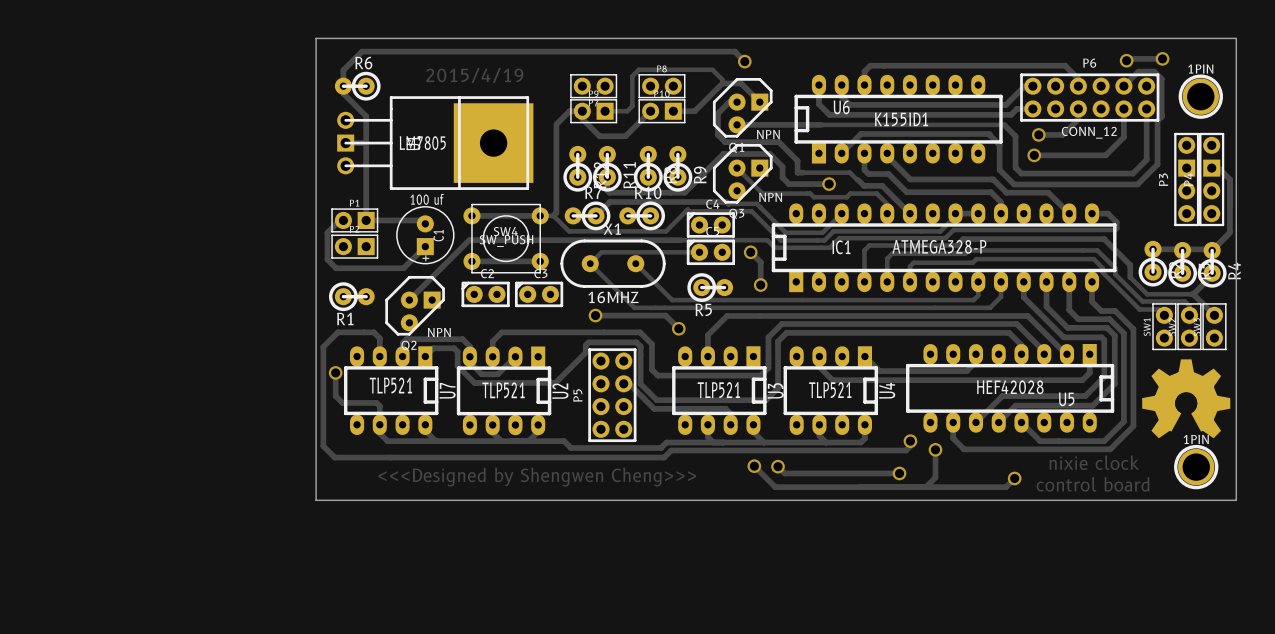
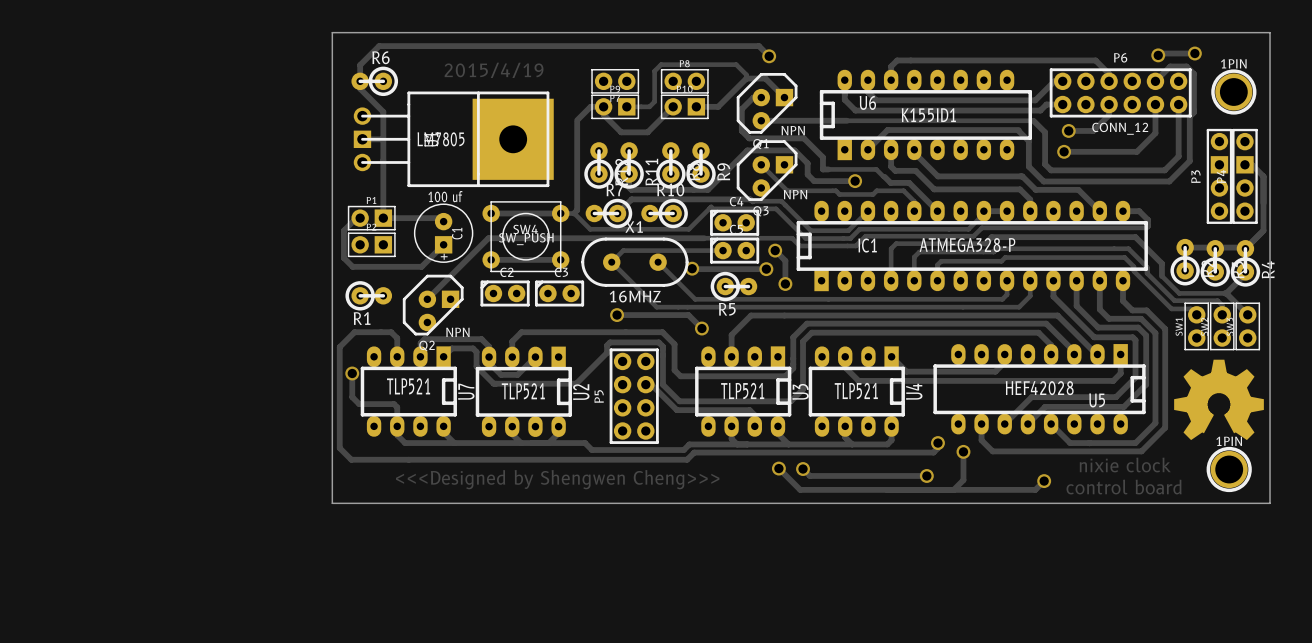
track: none -> (692, 268) (766, 269)
via: none -> (692, 268)
via: none -> (766, 269)

